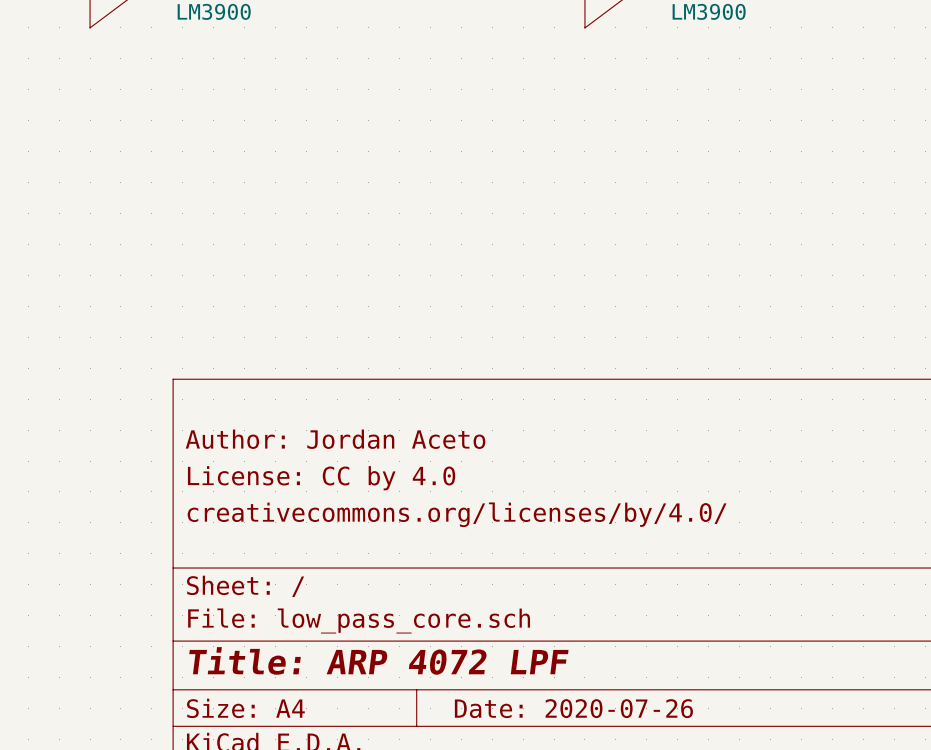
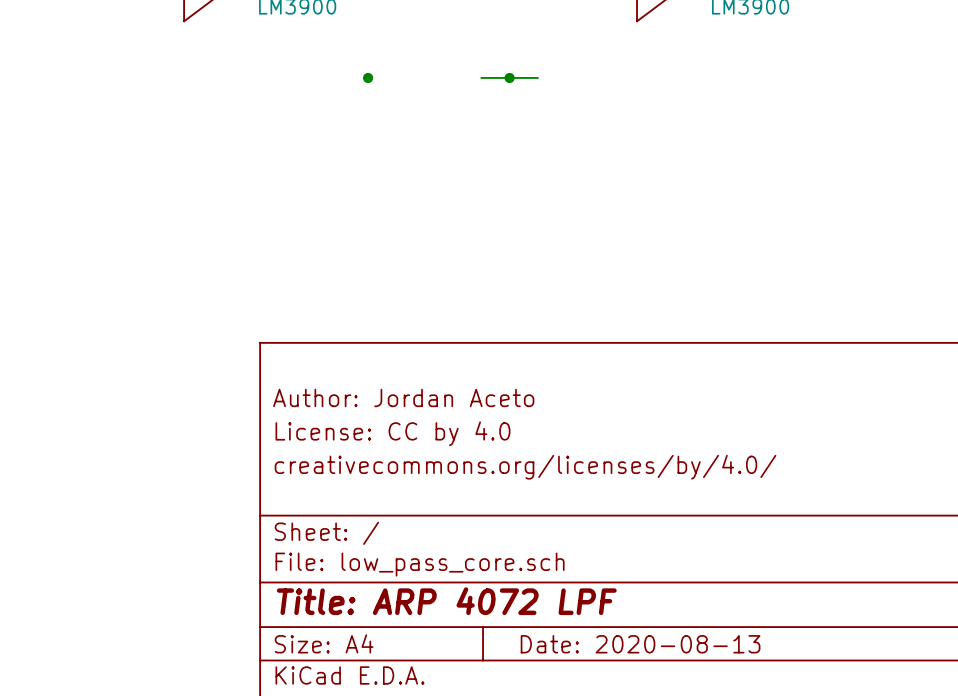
junction: none -> (368, 77)
wire: none -> (481, 77) (537, 77)
junction: none -> (509, 77)
title block: Date: 2020-07-26 (573, 708) -> Date: 2020-08-13 (640, 644)

